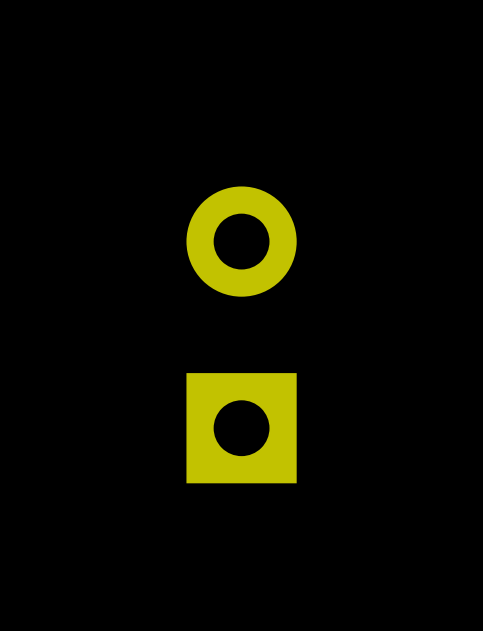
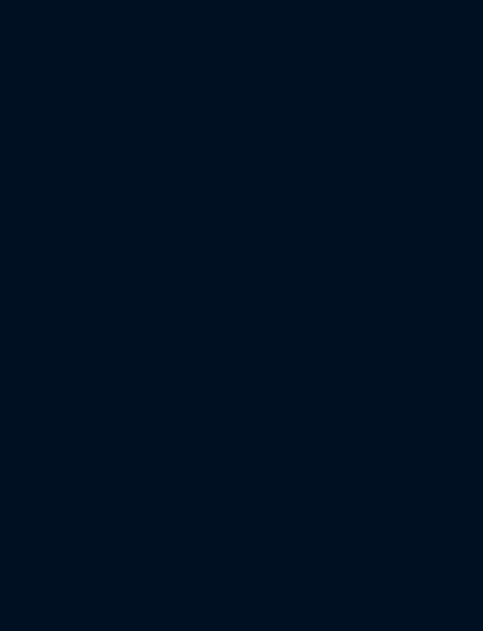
part: (241, 334) -> none

